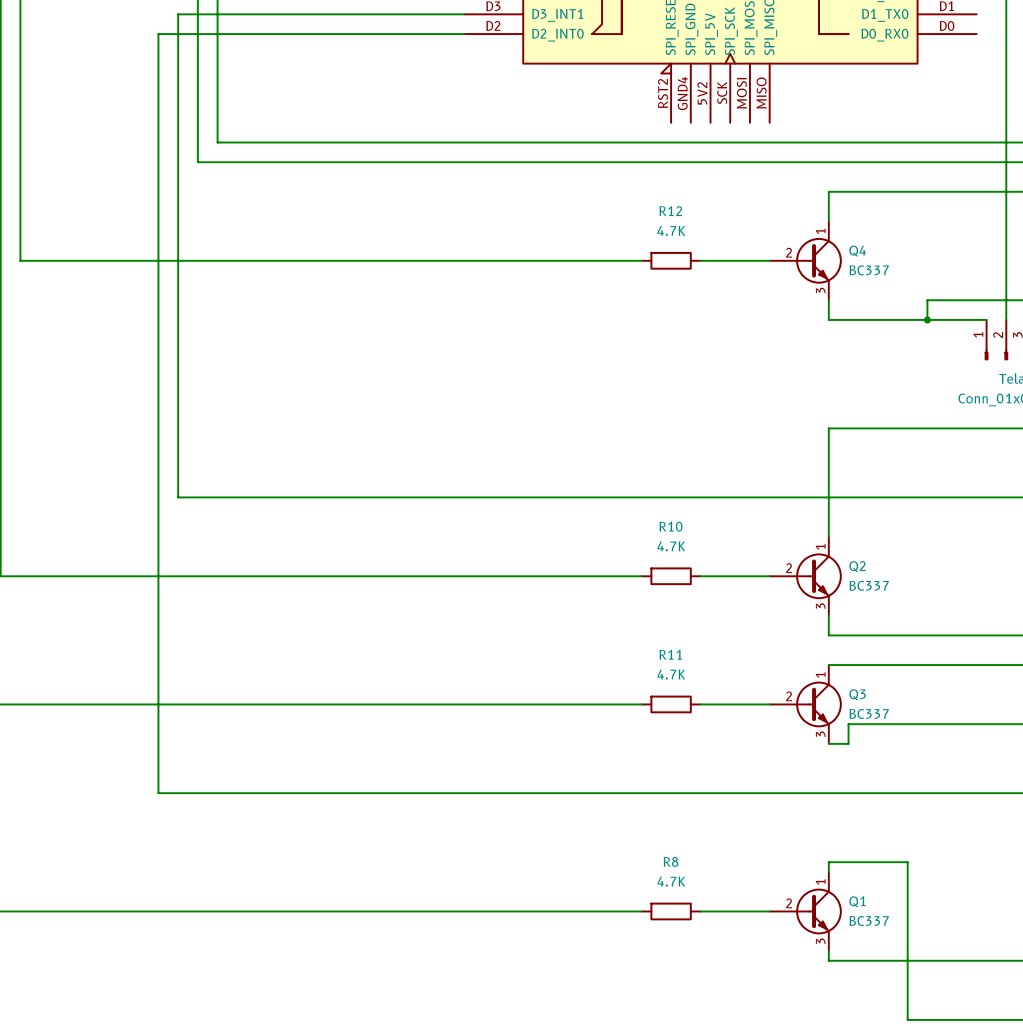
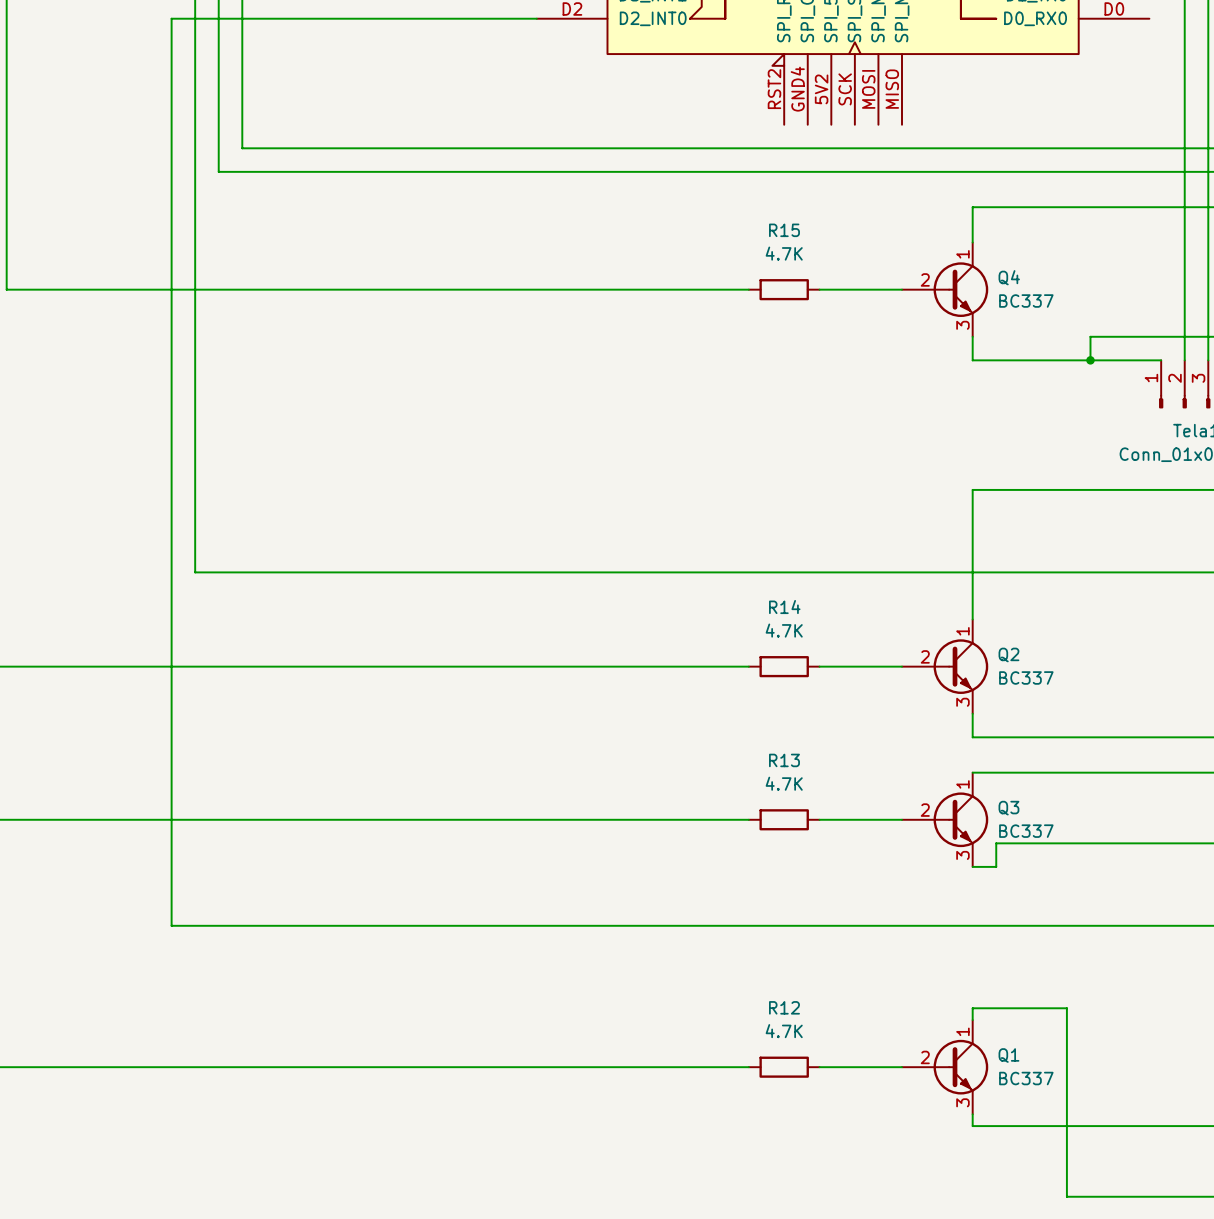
R12 name: R12 (670, 211) -> R15 (784, 230)
R10 name: R10 (670, 526) -> R14 (784, 607)
R11 name: R11 (670, 654) -> R13 (784, 760)
R8 name: R8 (671, 861) -> R12 (784, 1007)

